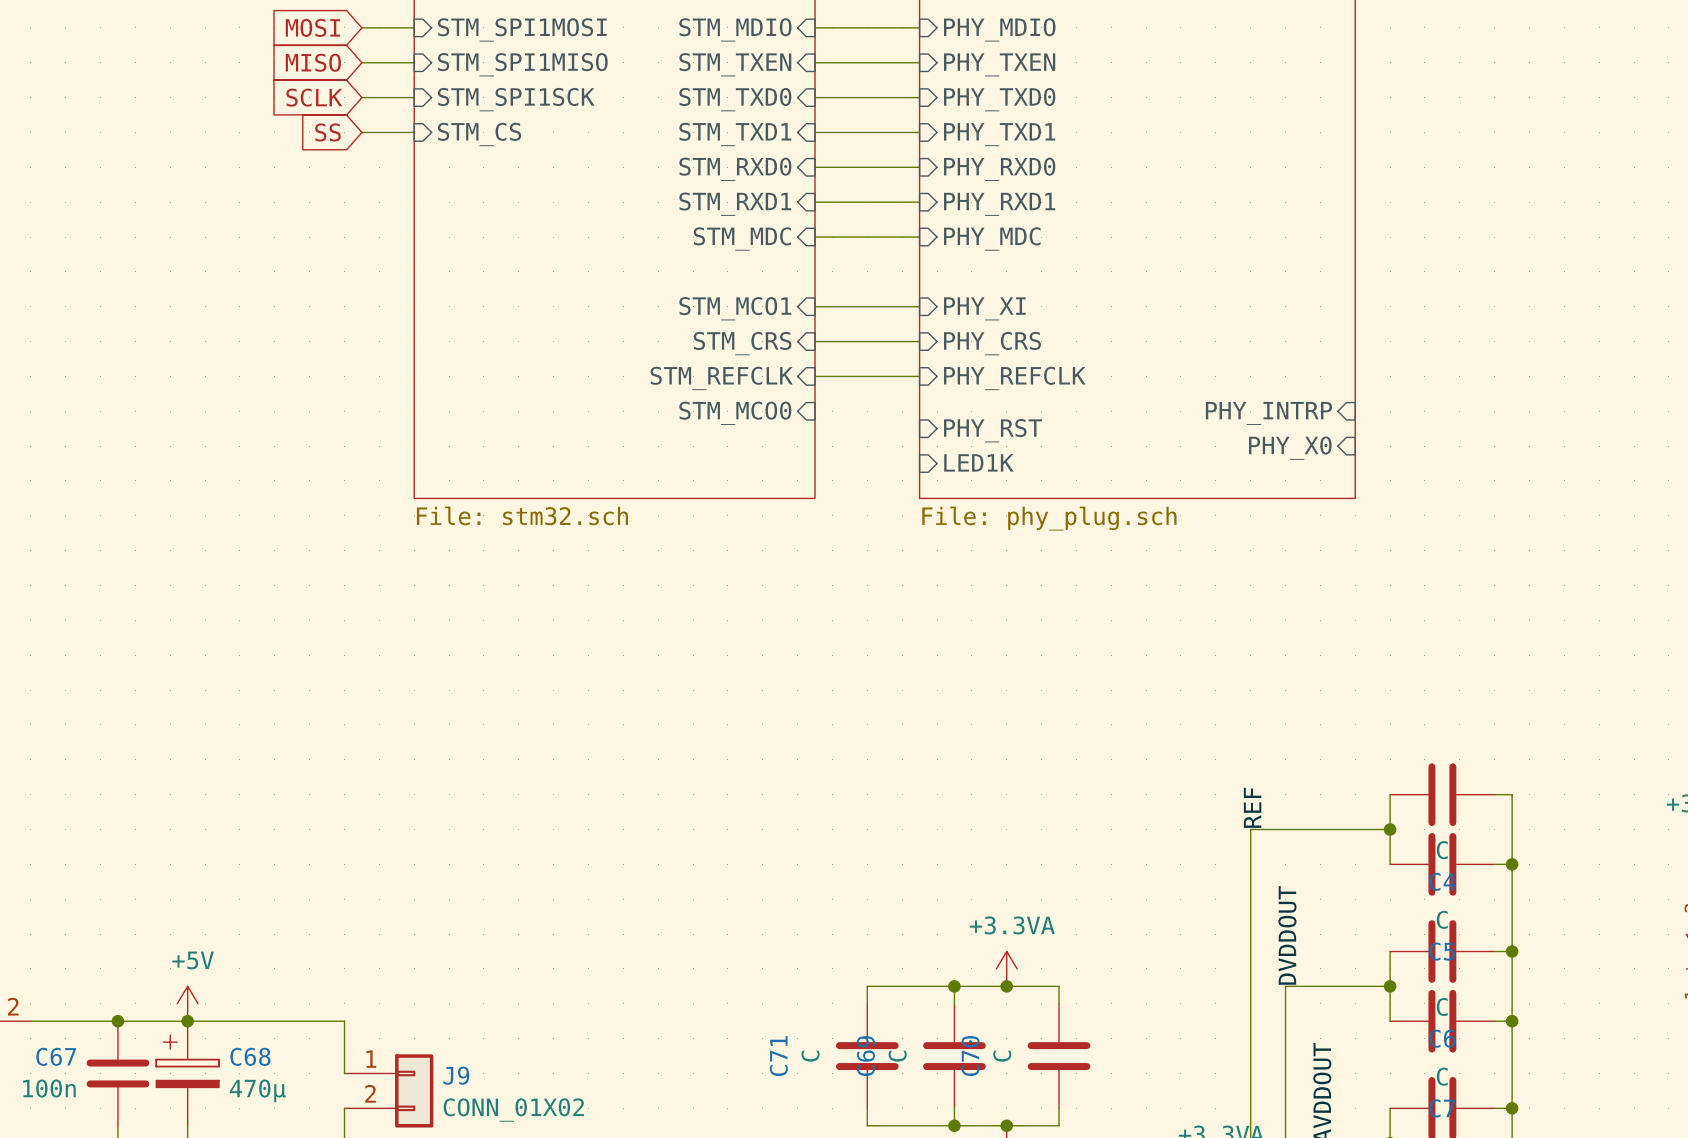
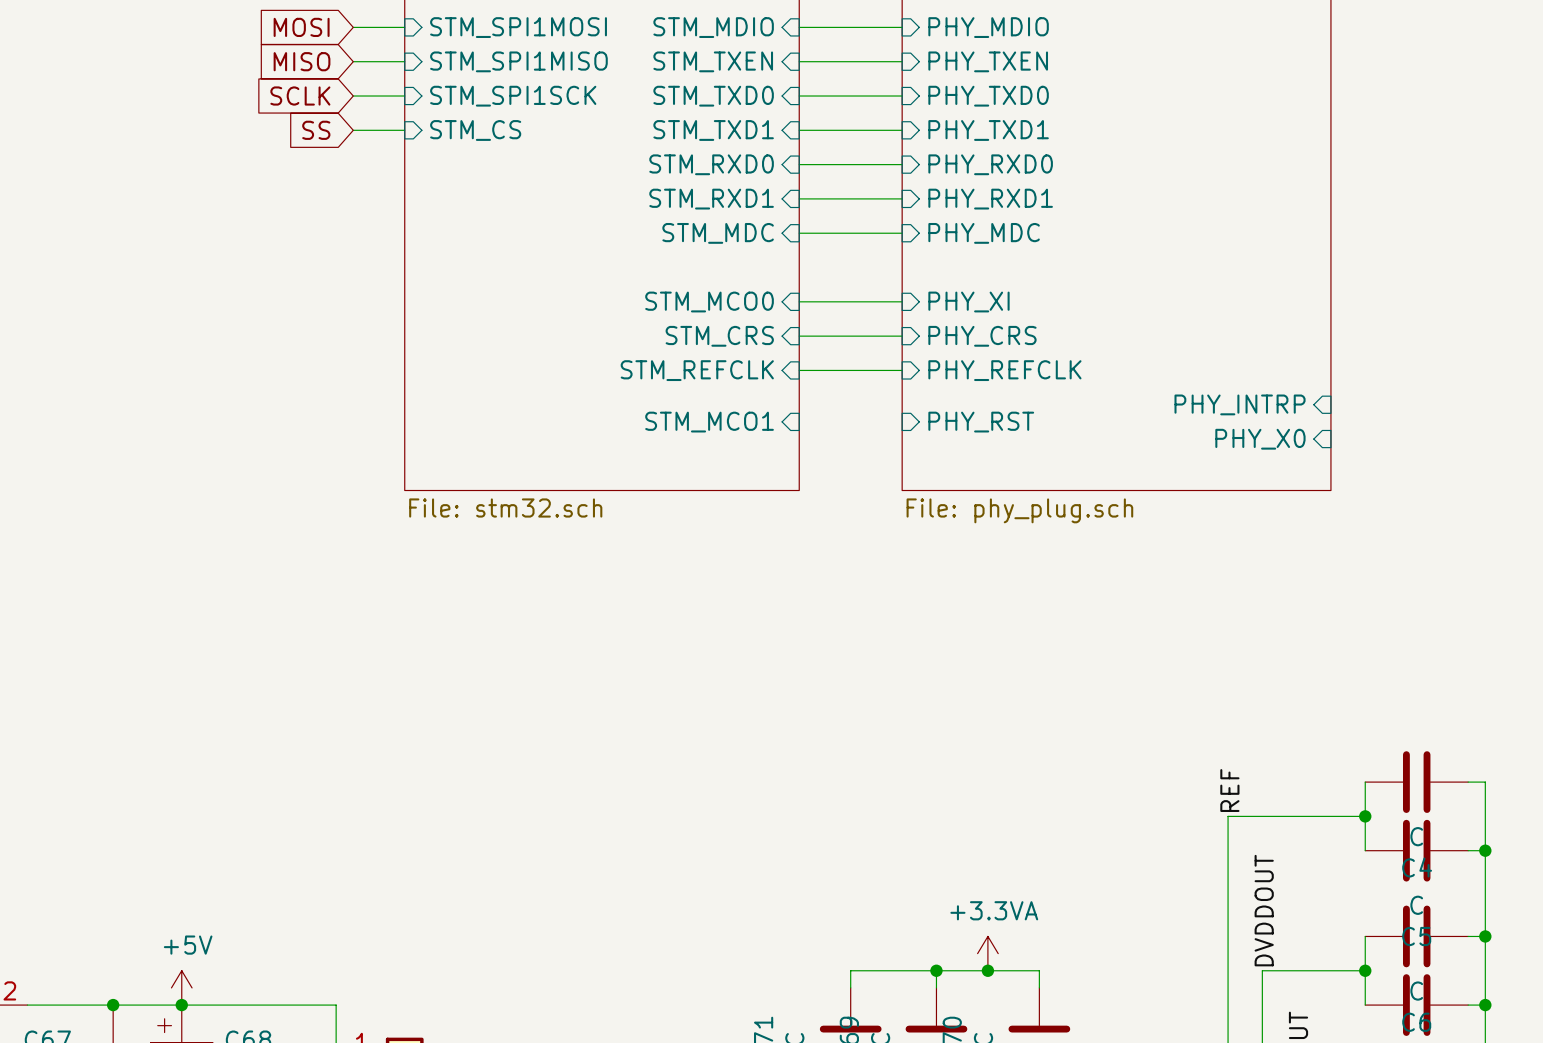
sheet pin: STM_MCO1 (735, 308) -> STM_MCO0 (709, 302)
sheet pin: STM_MCO0 (735, 413) -> STM_MCO1 (709, 422)
sheet pin: LED1K (978, 462) -> none

